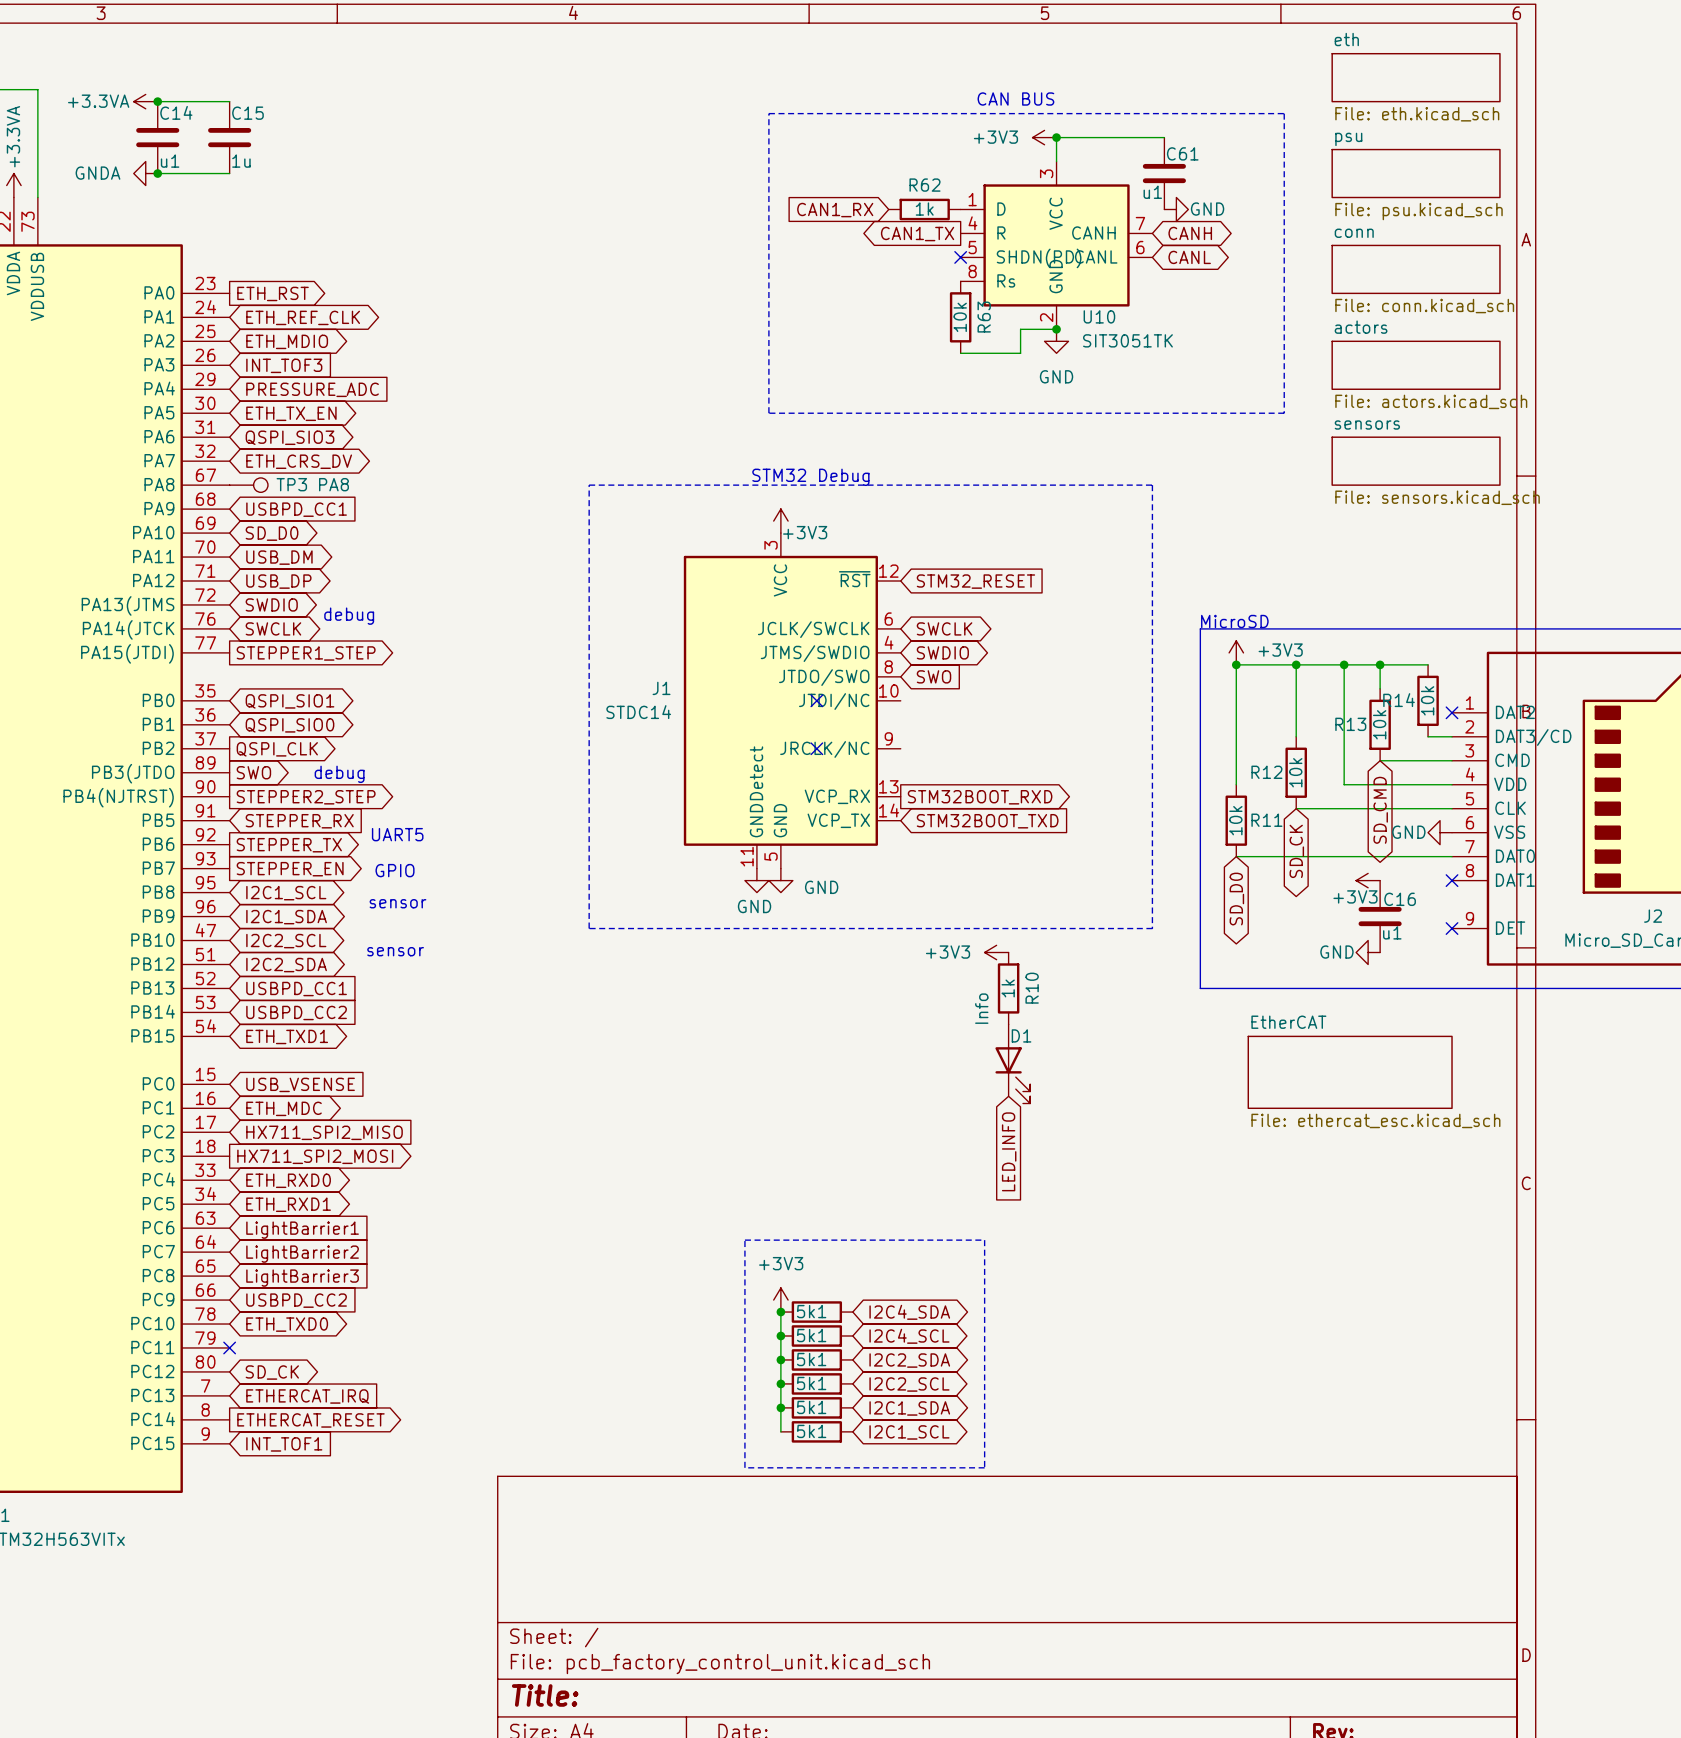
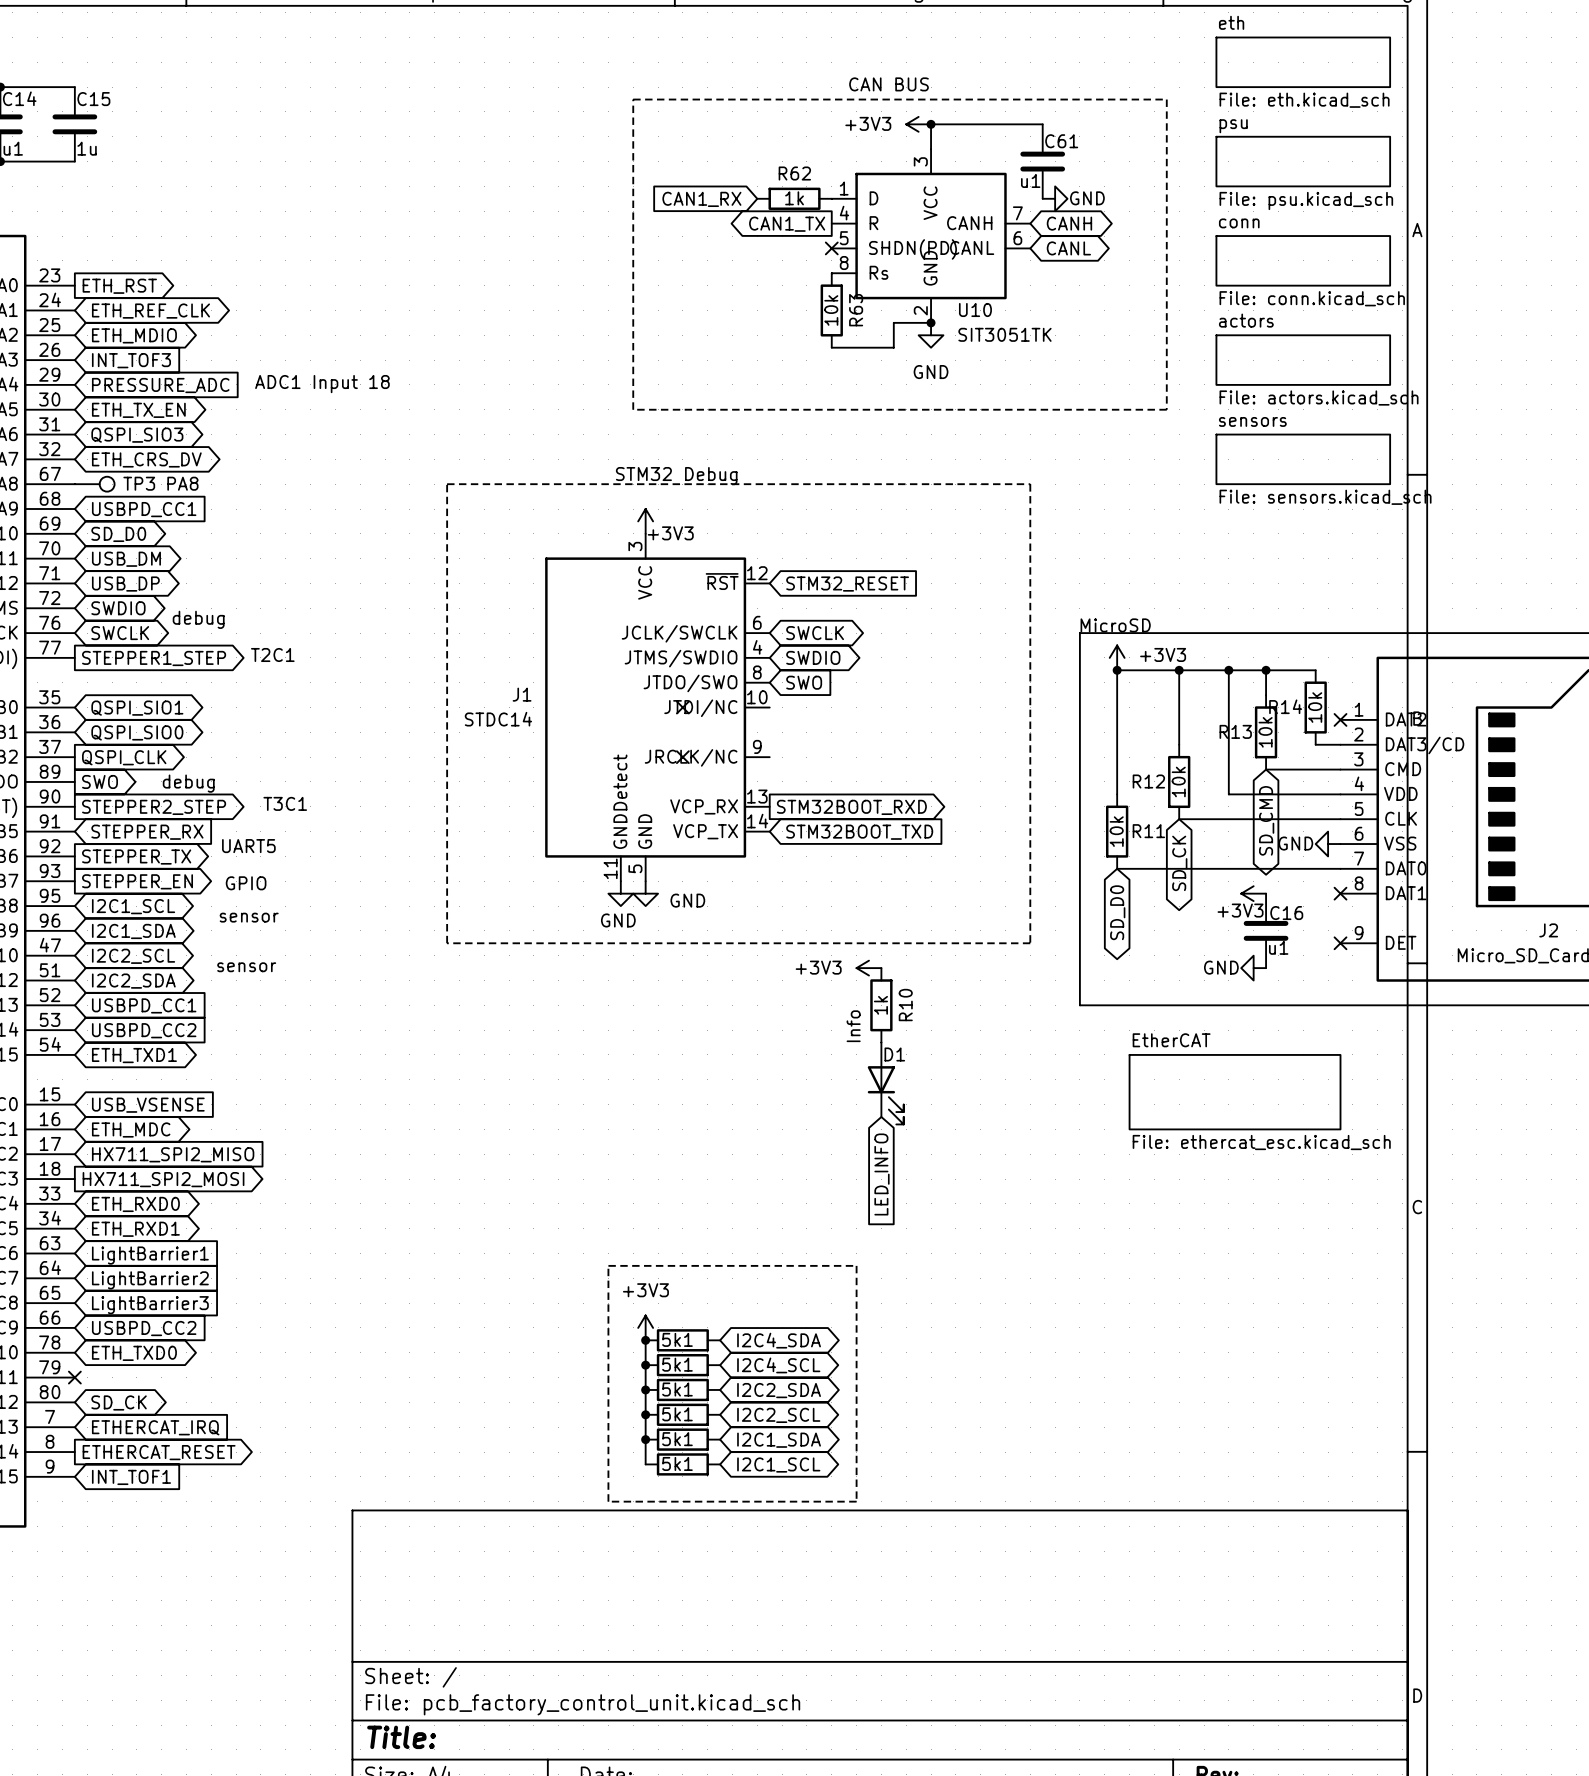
text: none -> ADC1 Input 18 (322, 384)
text: none -> T2C1 (272, 654)
text: none -> T3C1 (285, 803)

